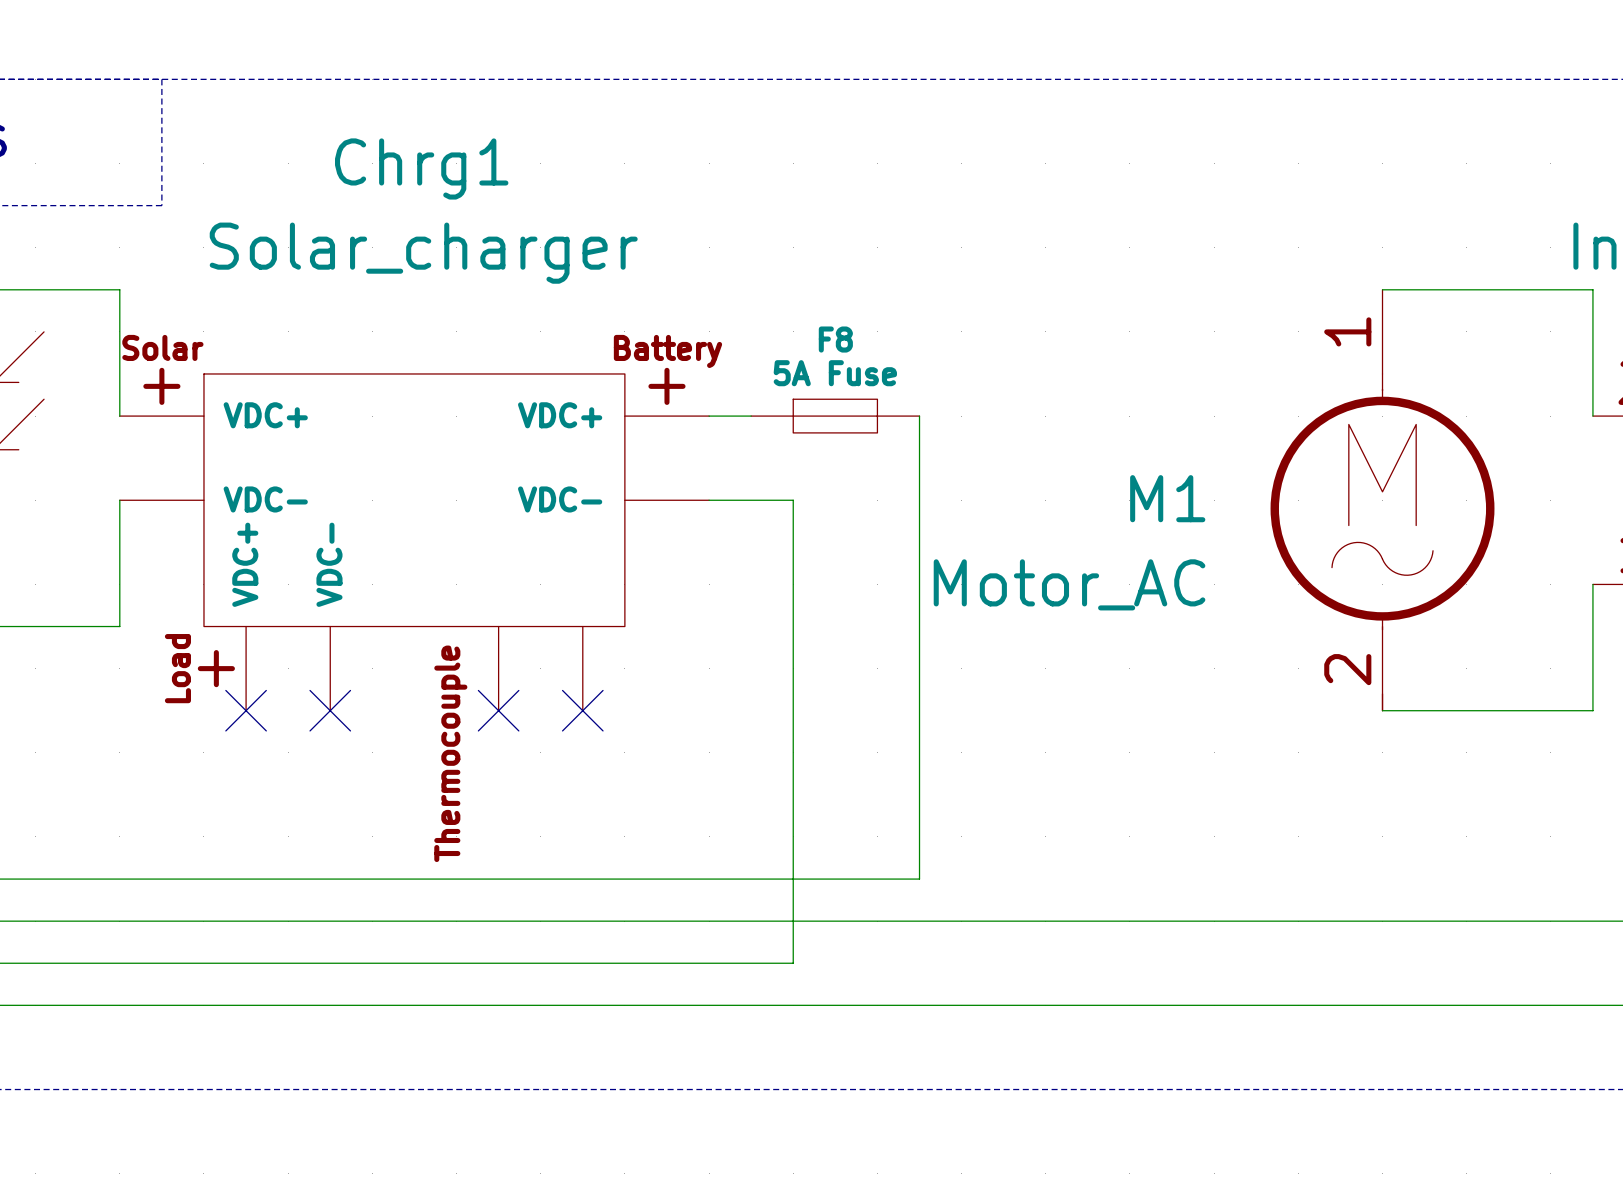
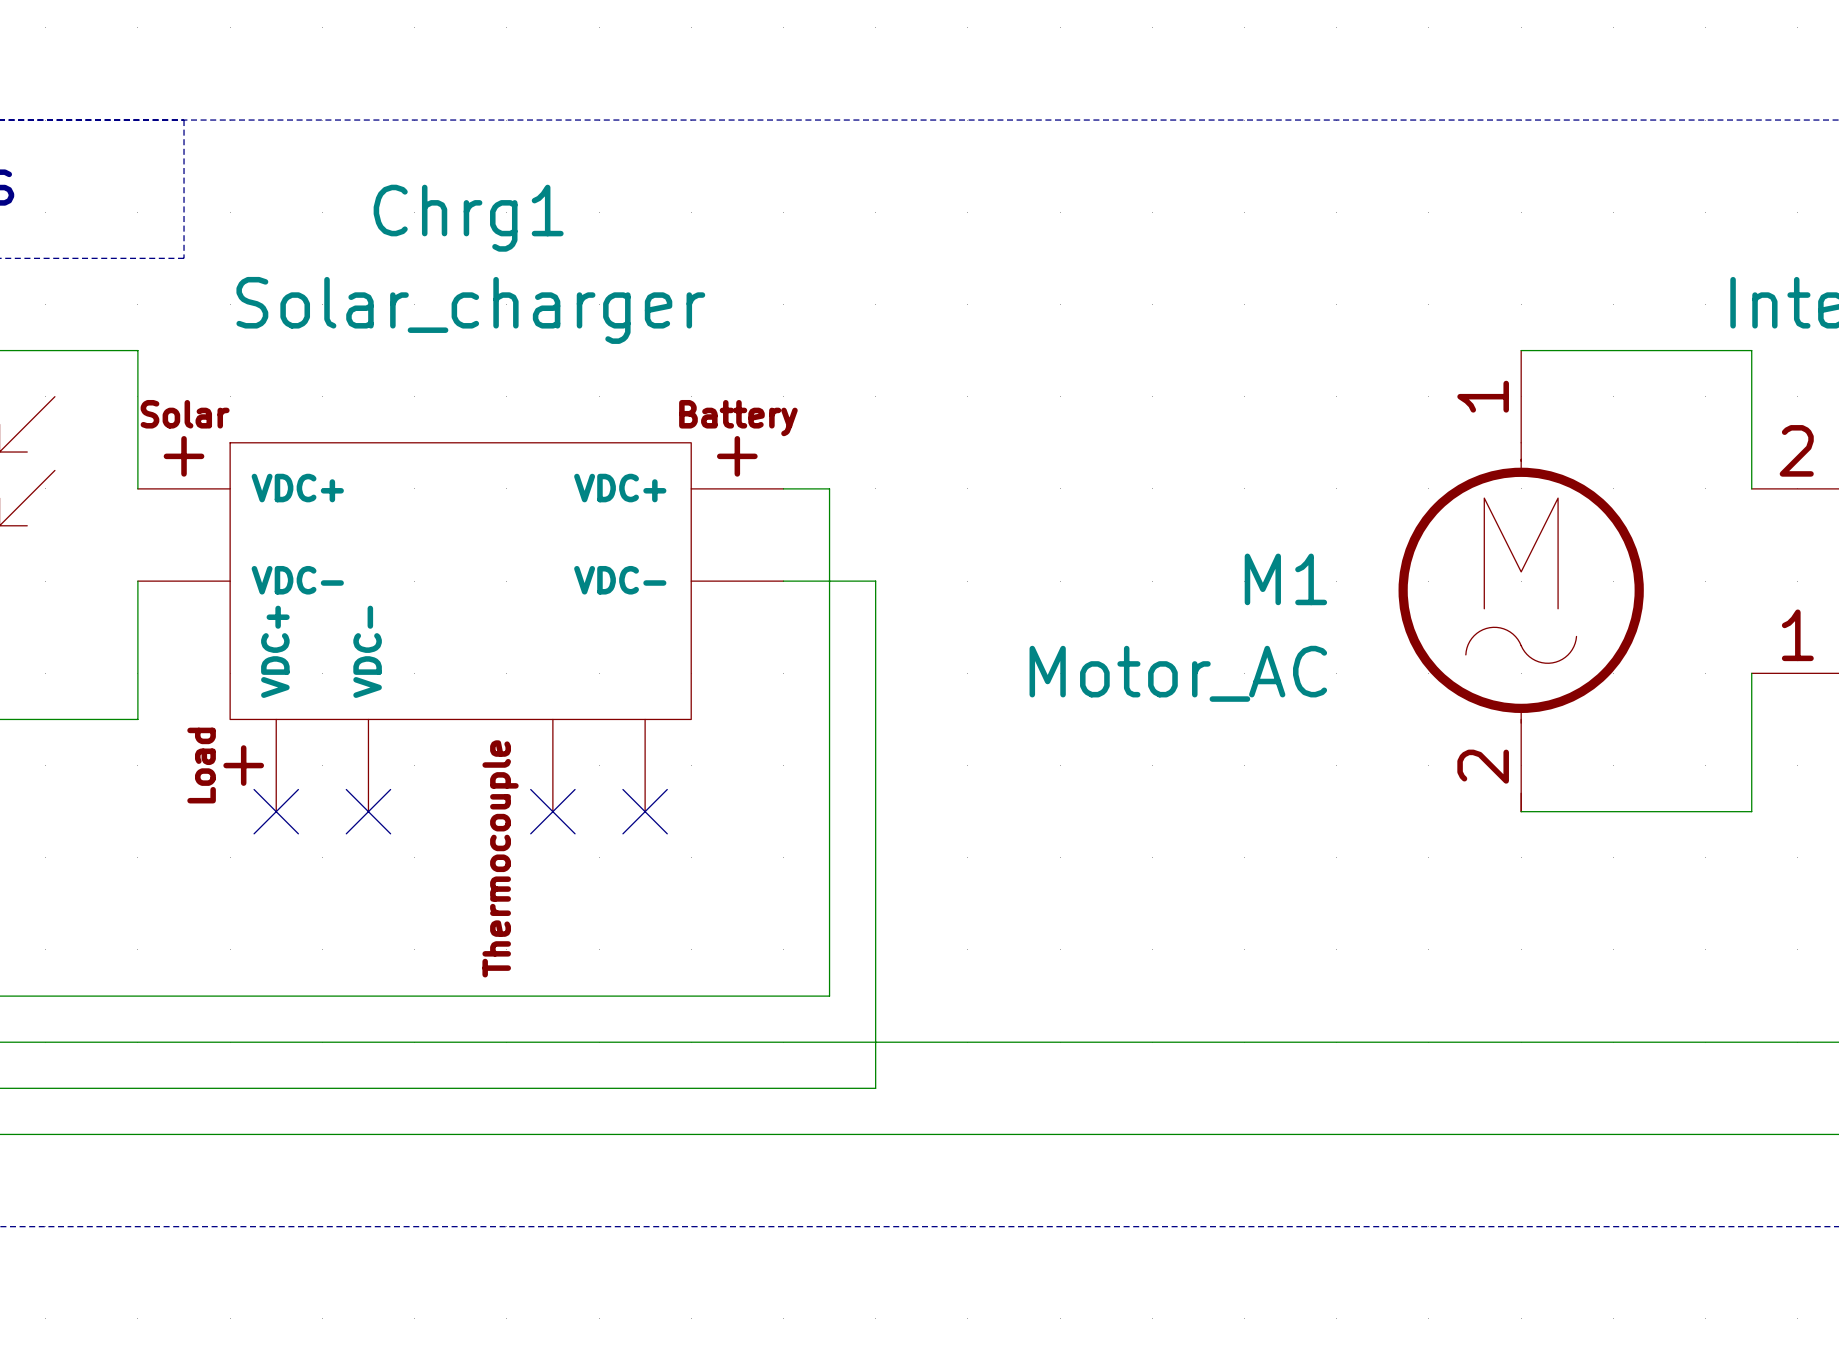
F8: 5A Fuse (835, 416) -> none
wire: (919, 416) (919, 879) (751, 879) -> (829, 488) (829, 996)

